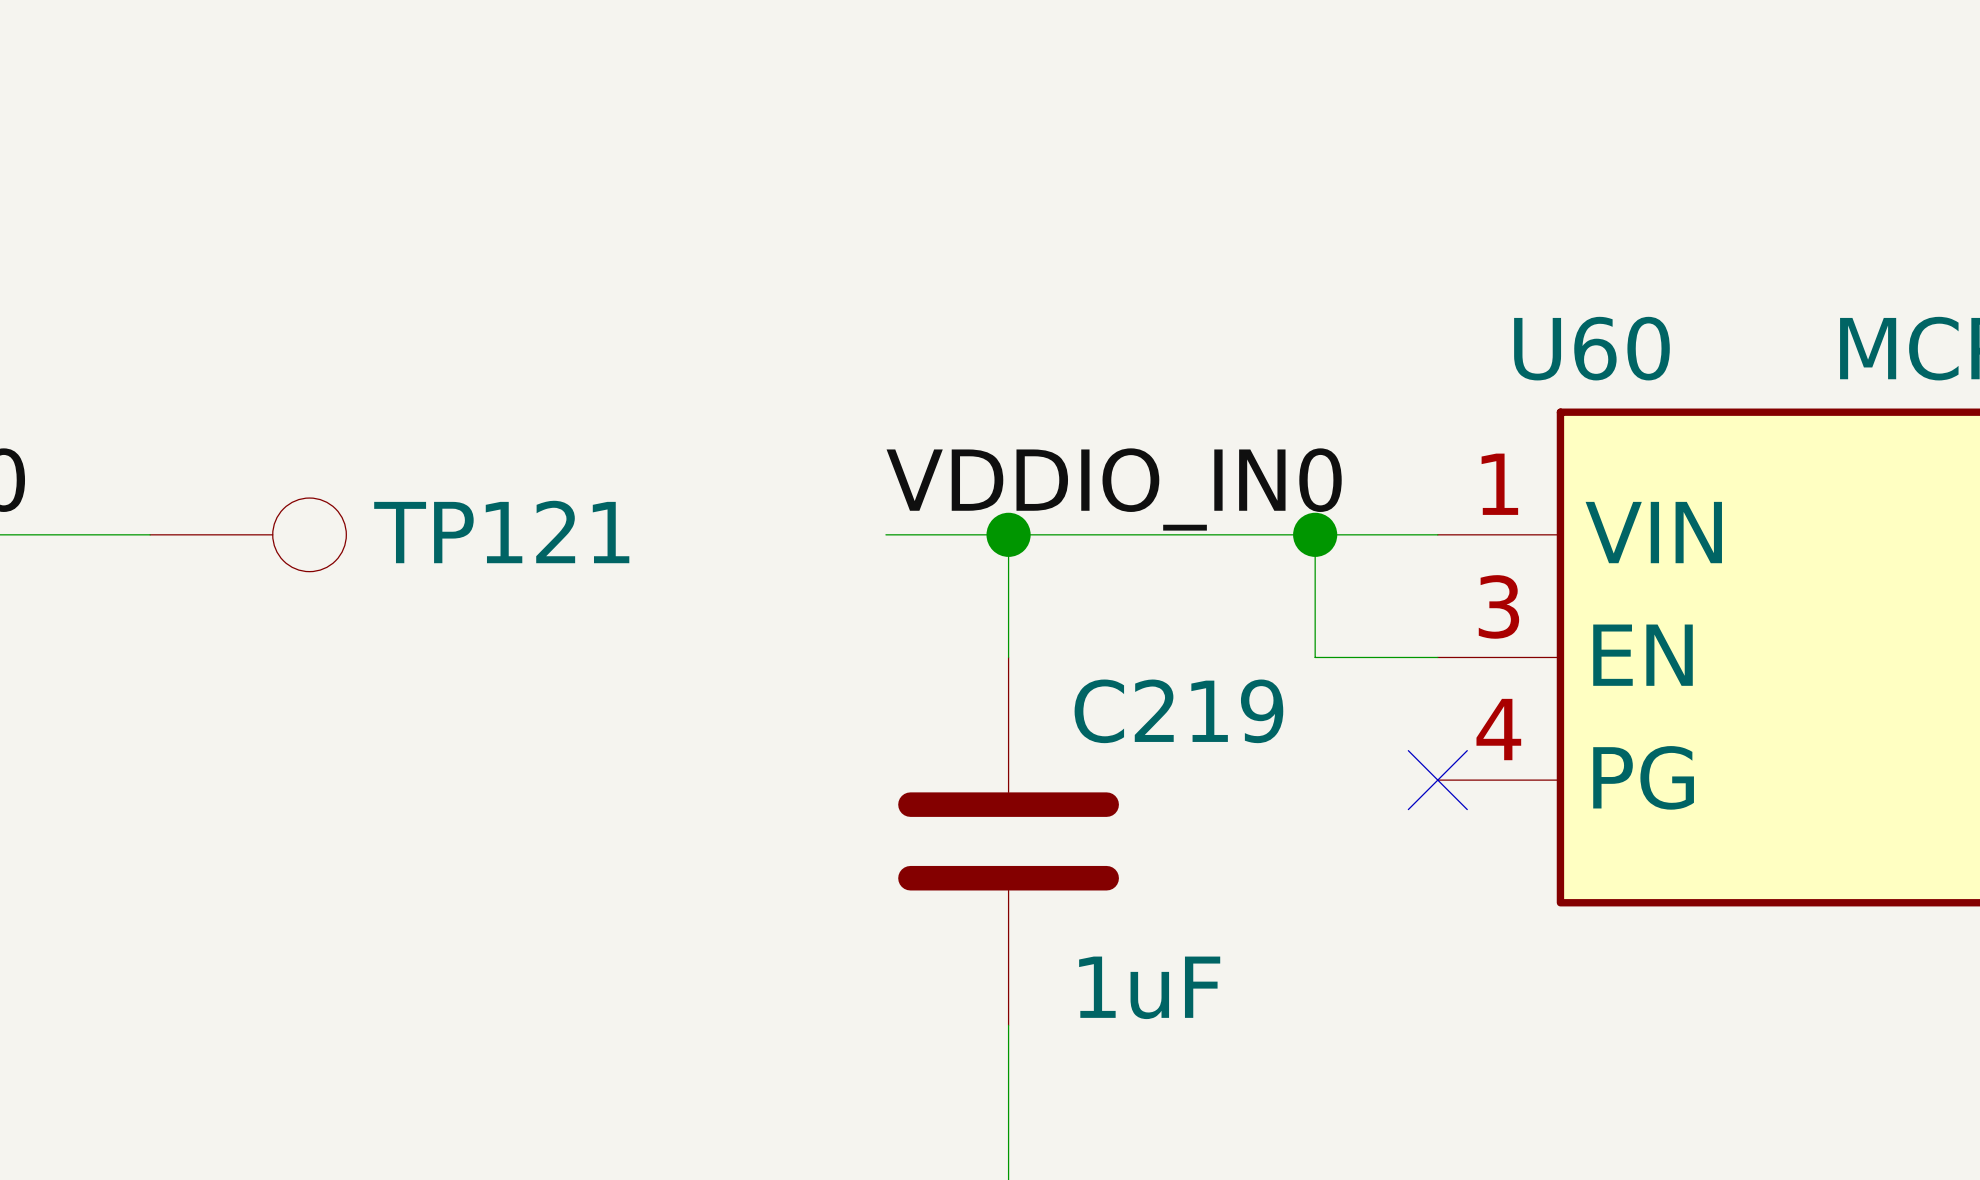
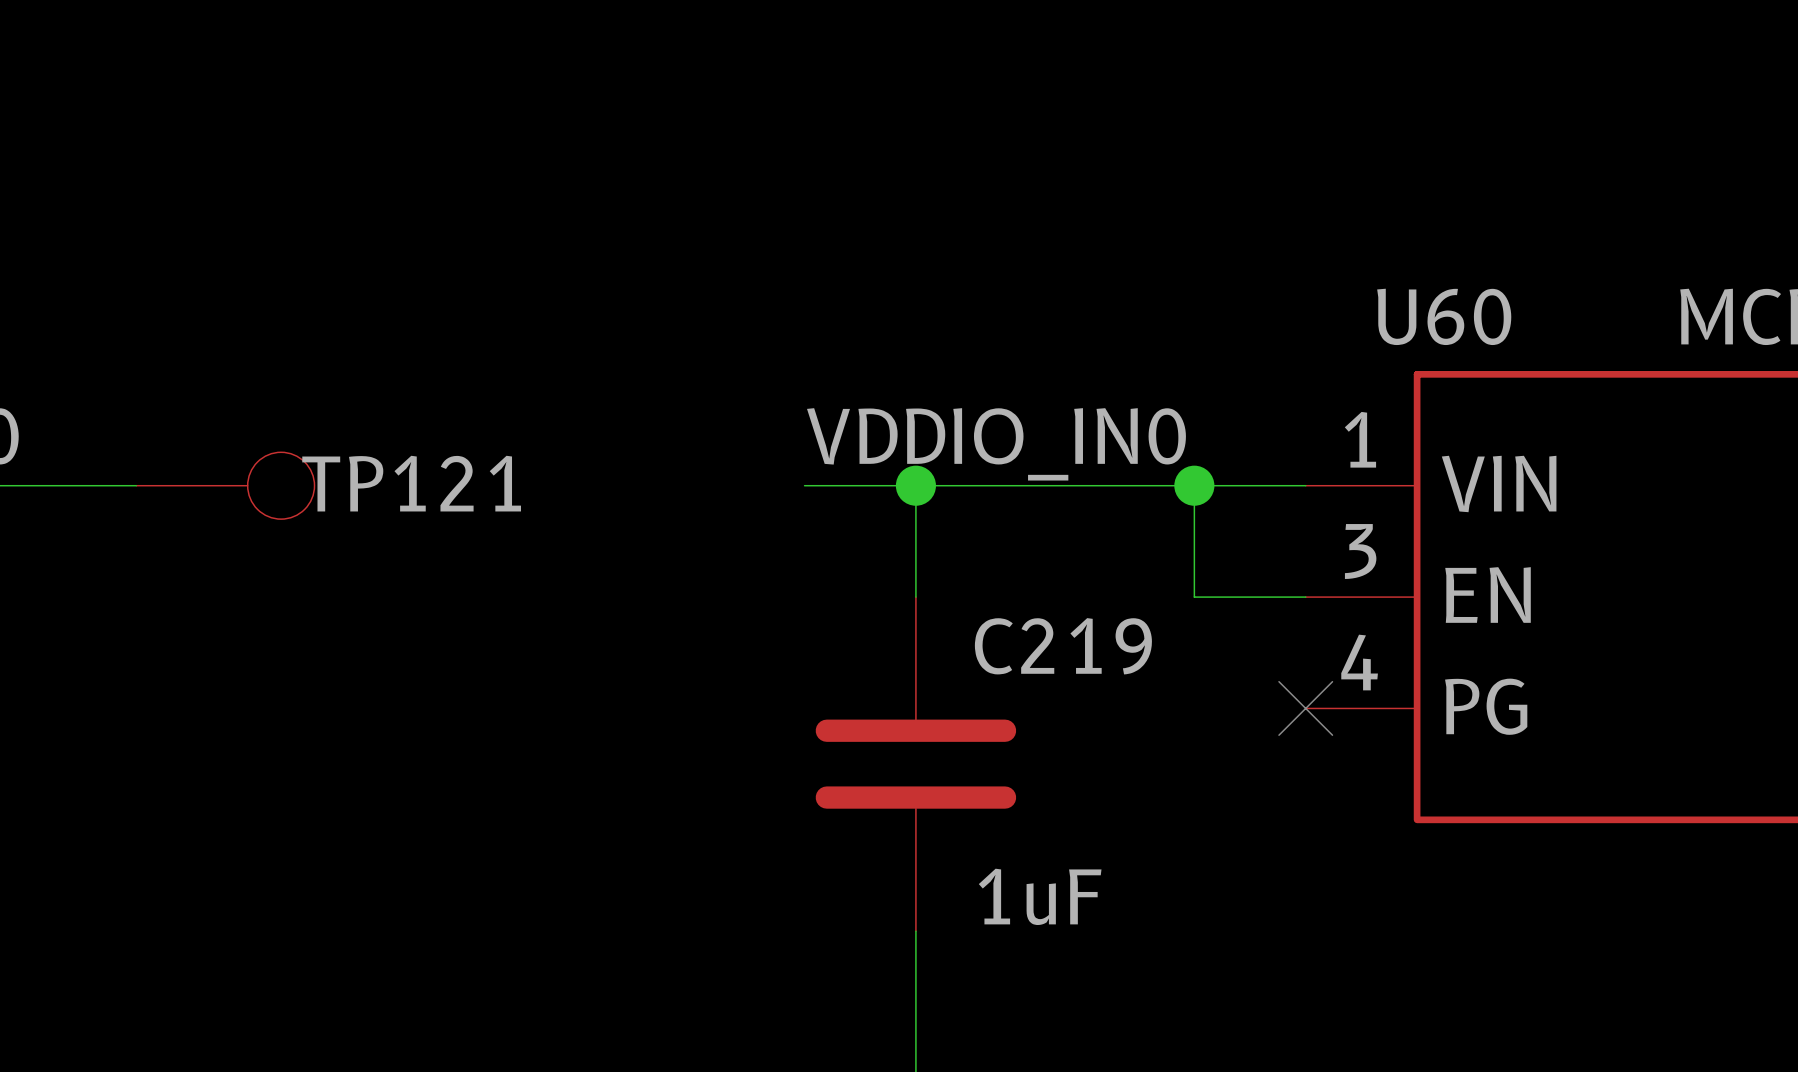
TP121 name position: TP121 (501, 531) -> TP121 (411, 483)

